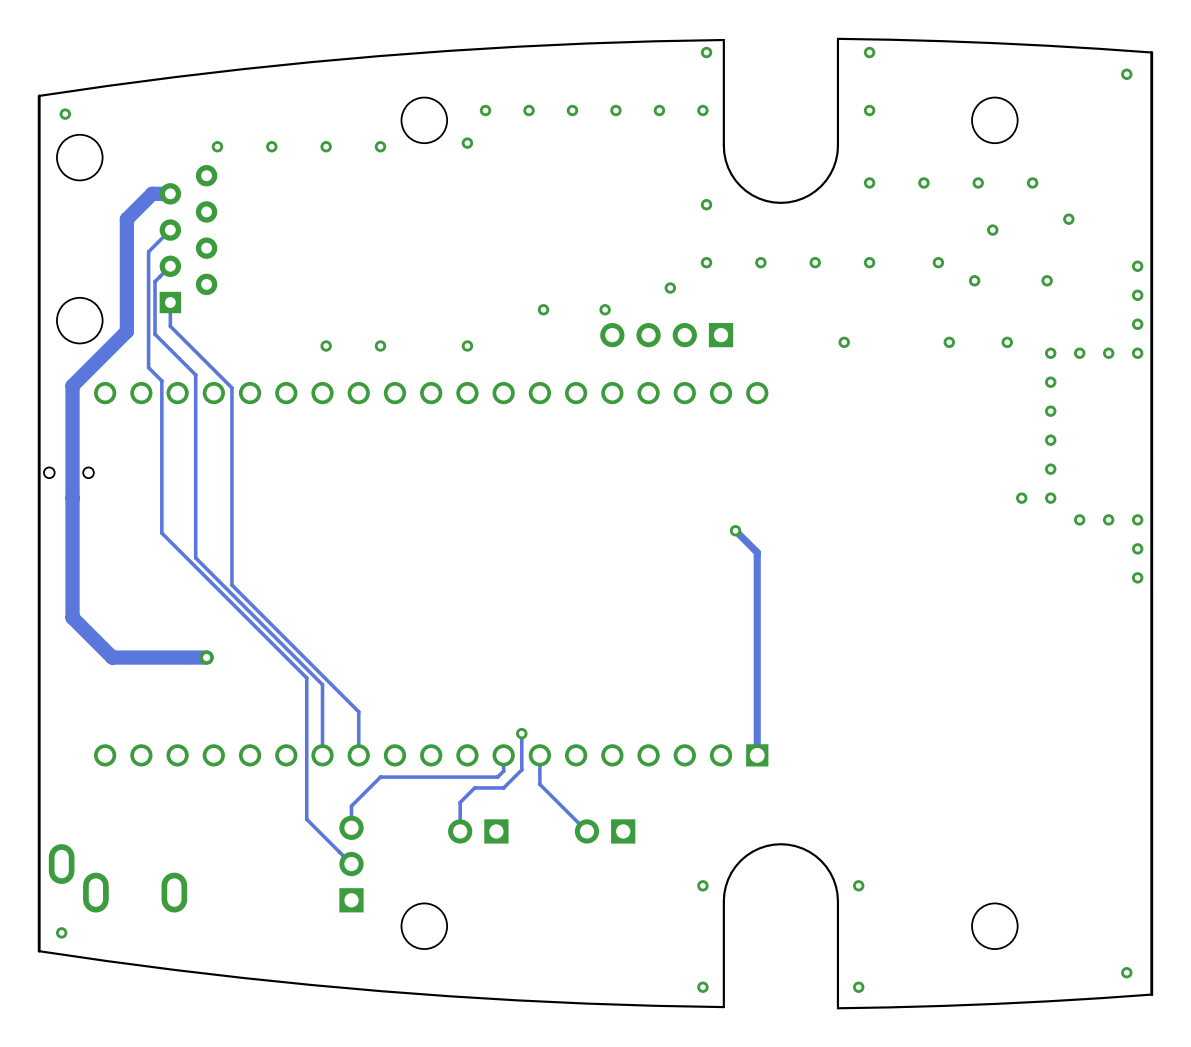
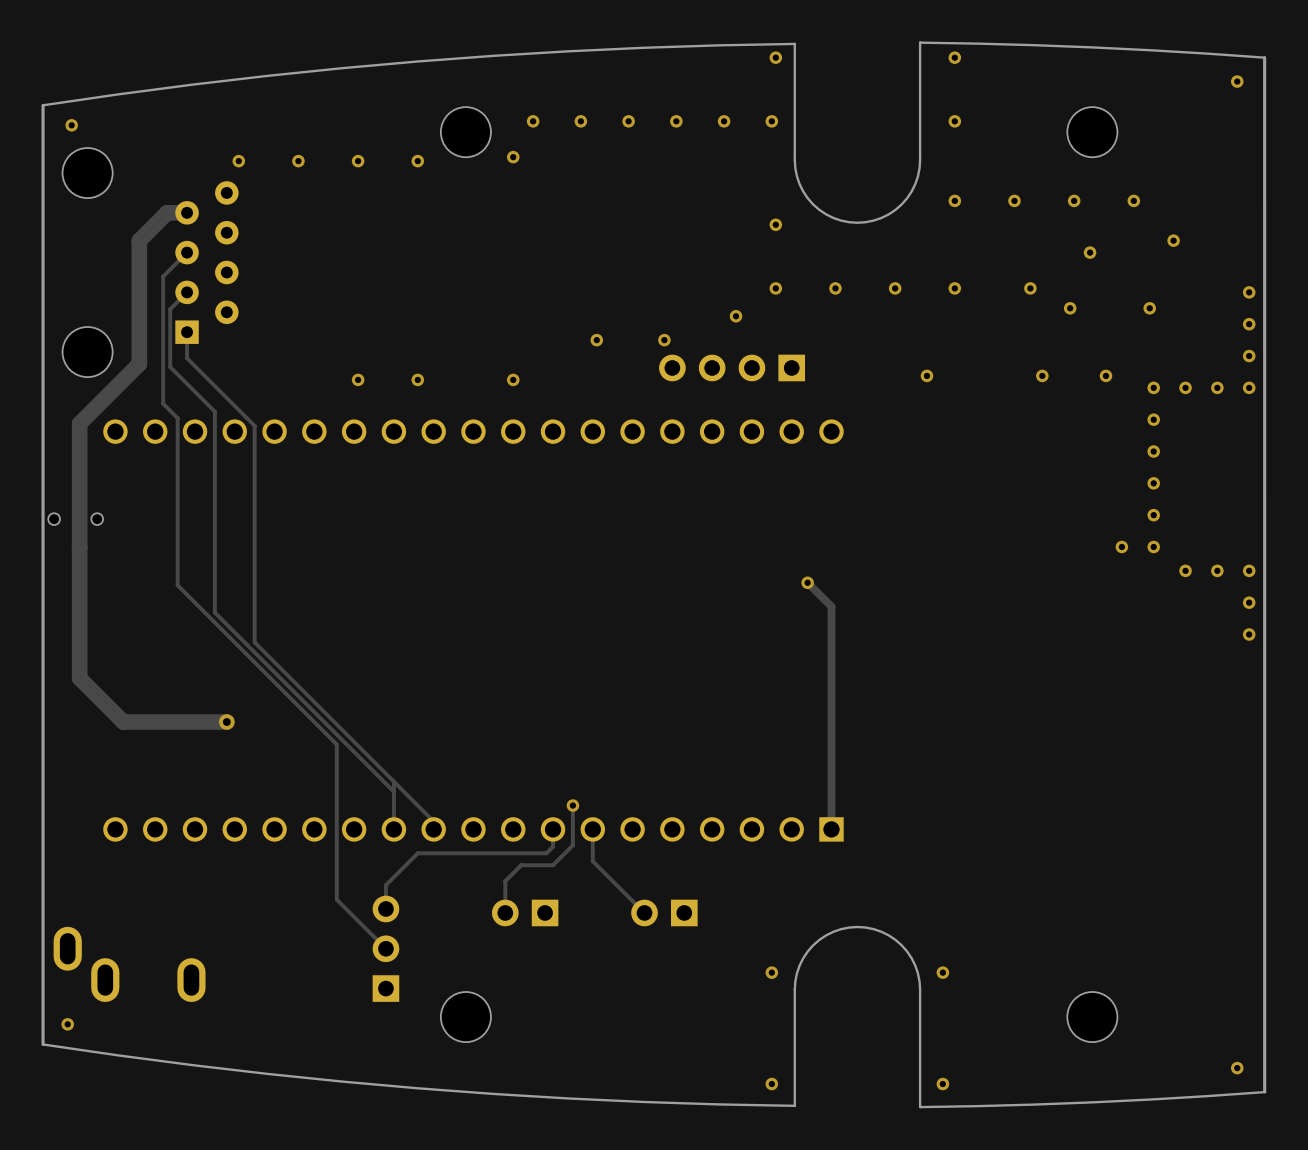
track: (195, 557) (322, 684) (322, 755) -> (214, 612) (393, 791)
track: (231, 585) (358, 711) -> (254, 642) (433, 821) (433, 829)

